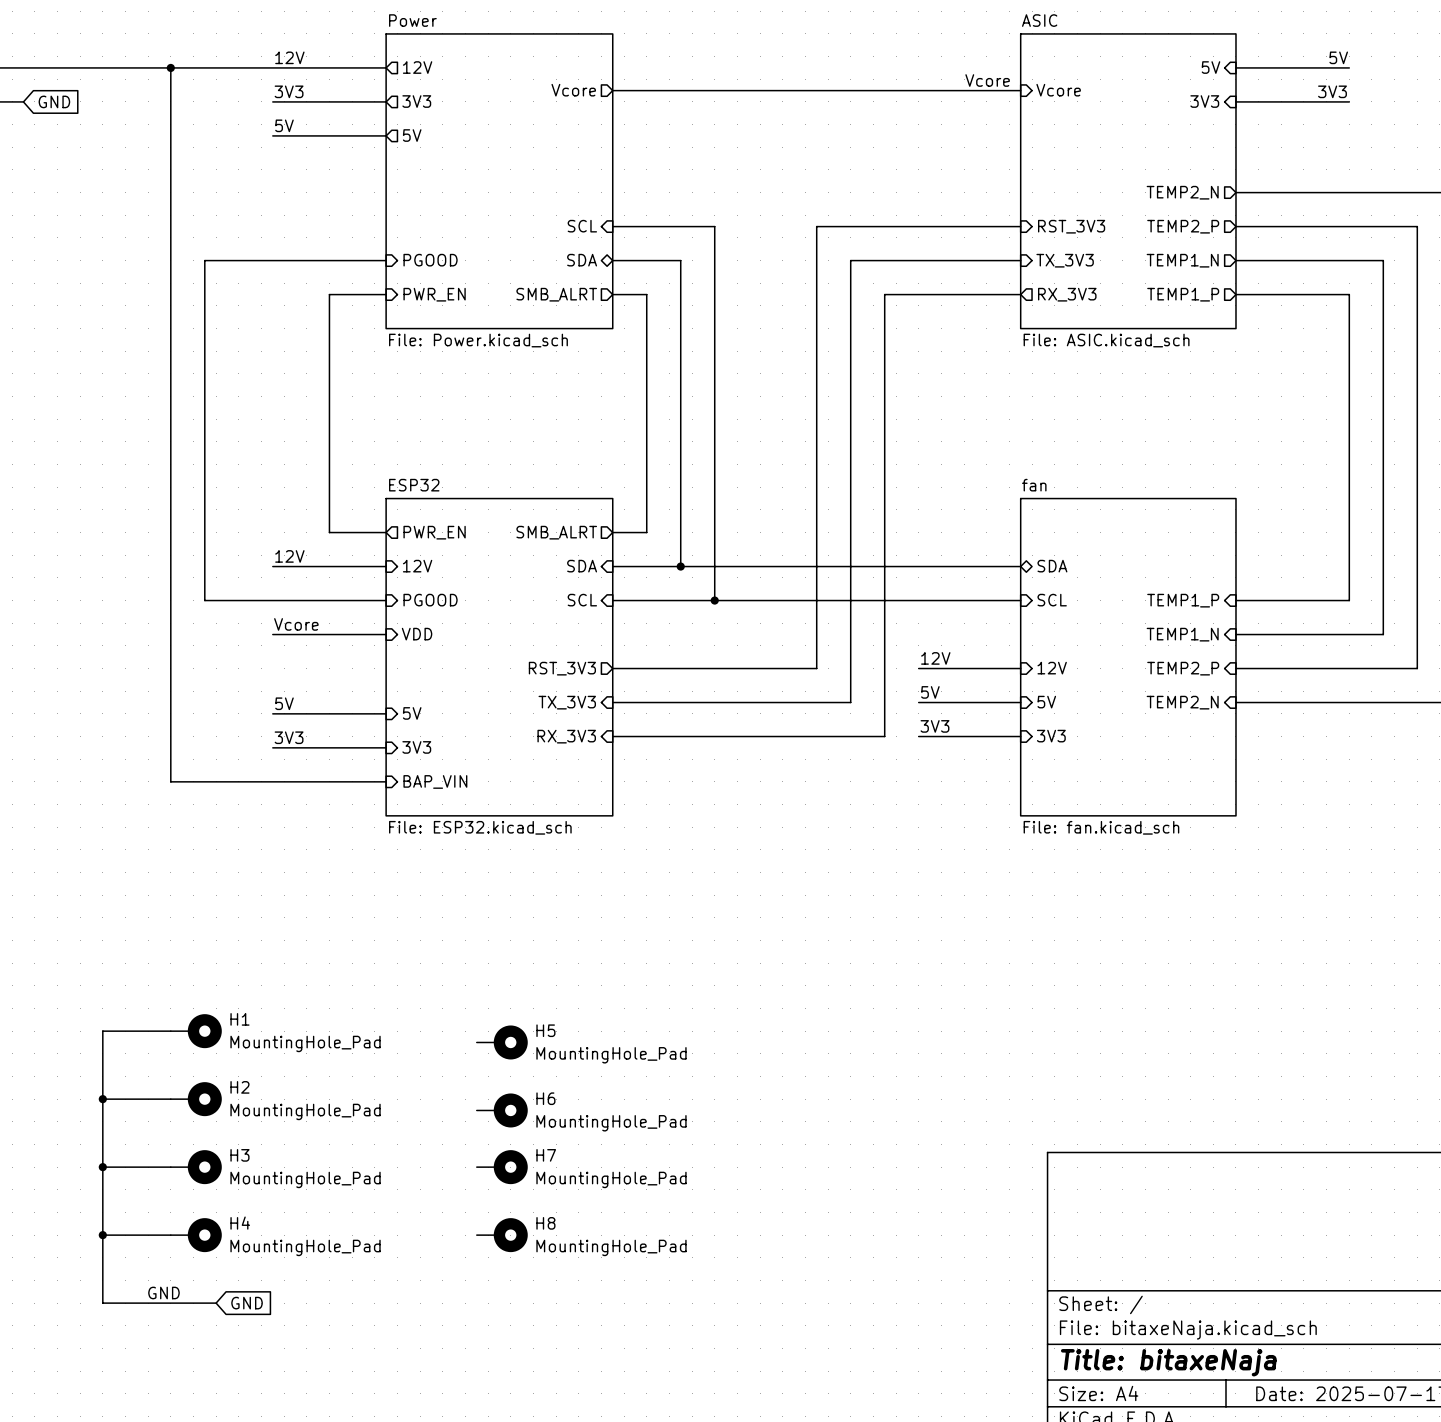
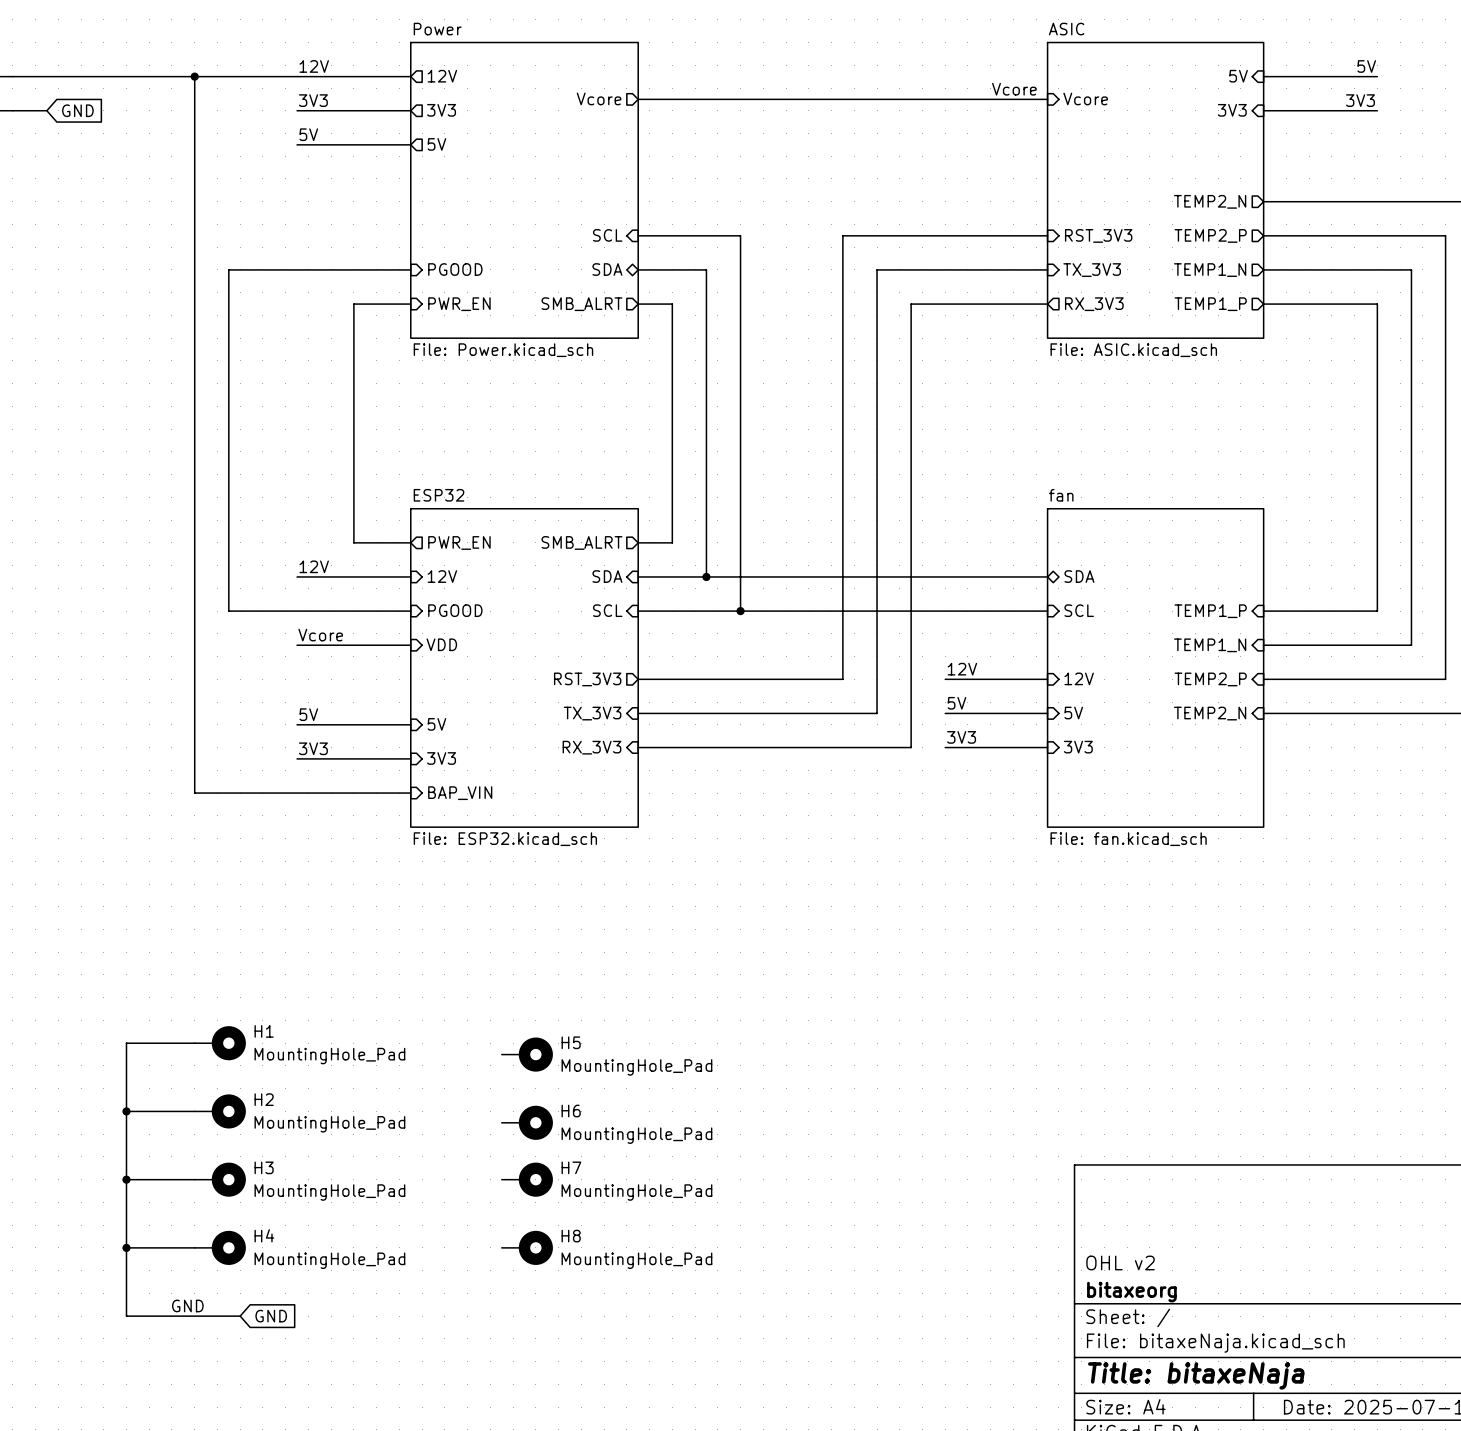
title block: none -> OHL v2 (1120, 1262)
title block: none -> bitaxeorg (1131, 1292)

